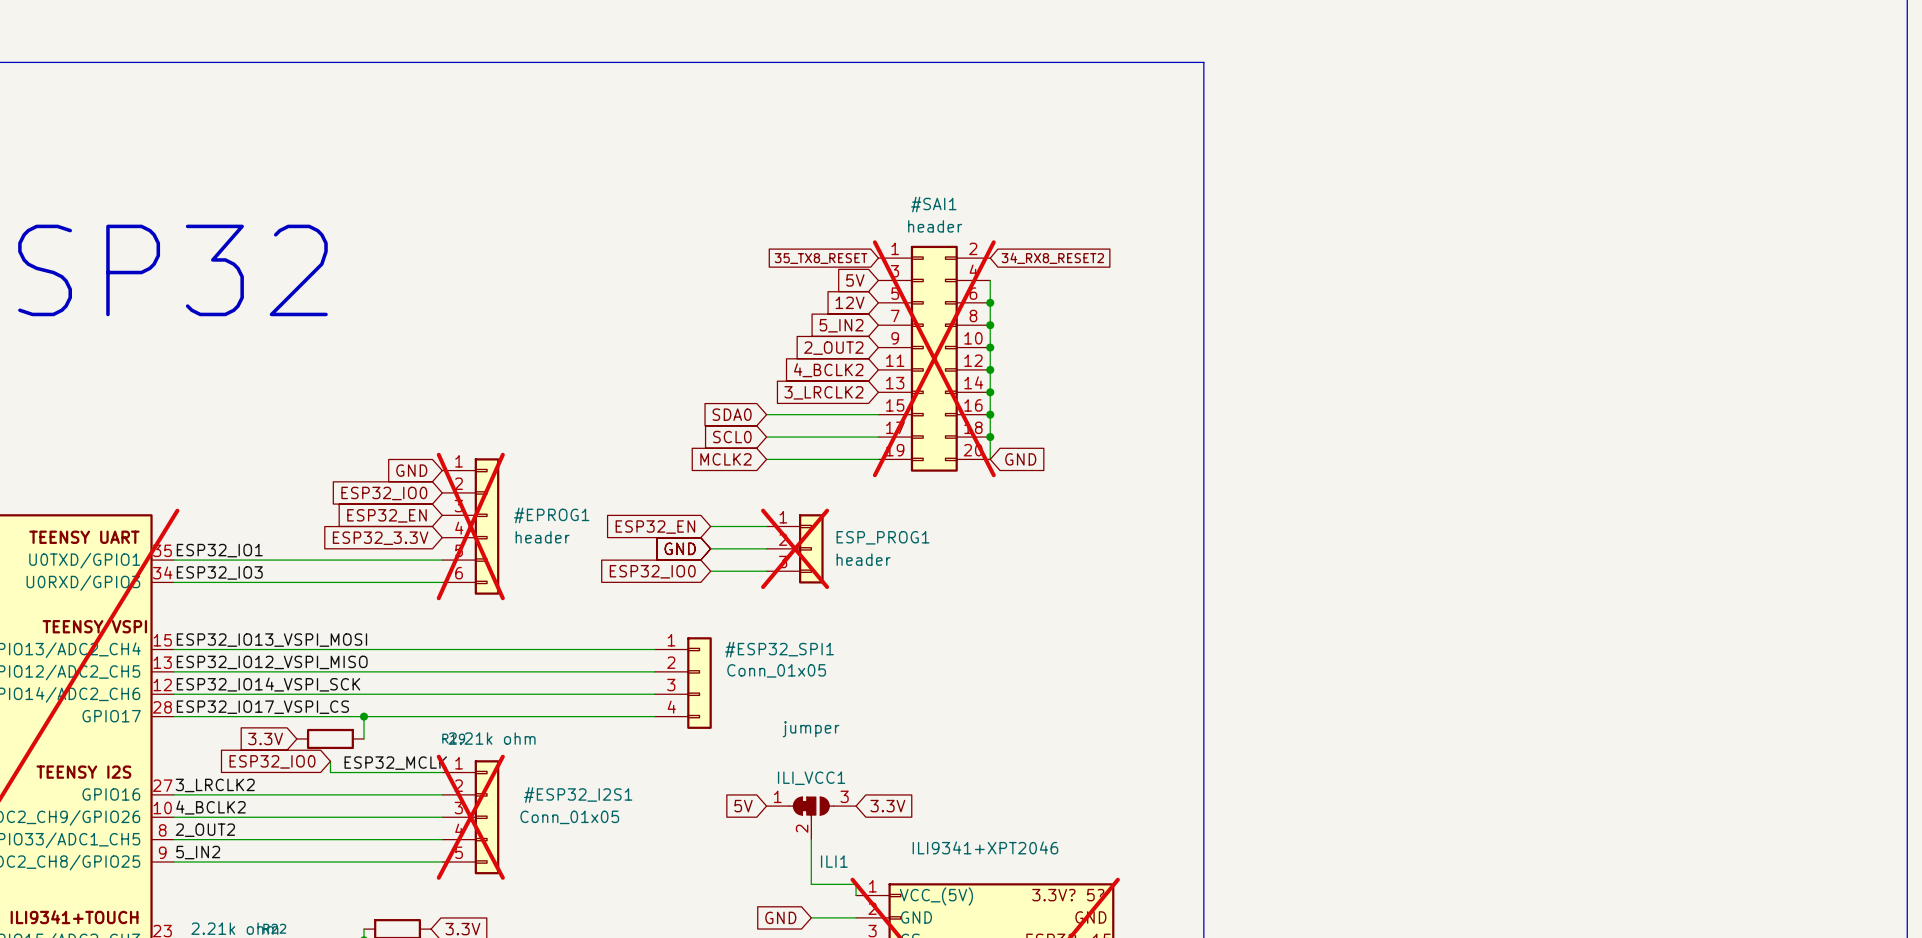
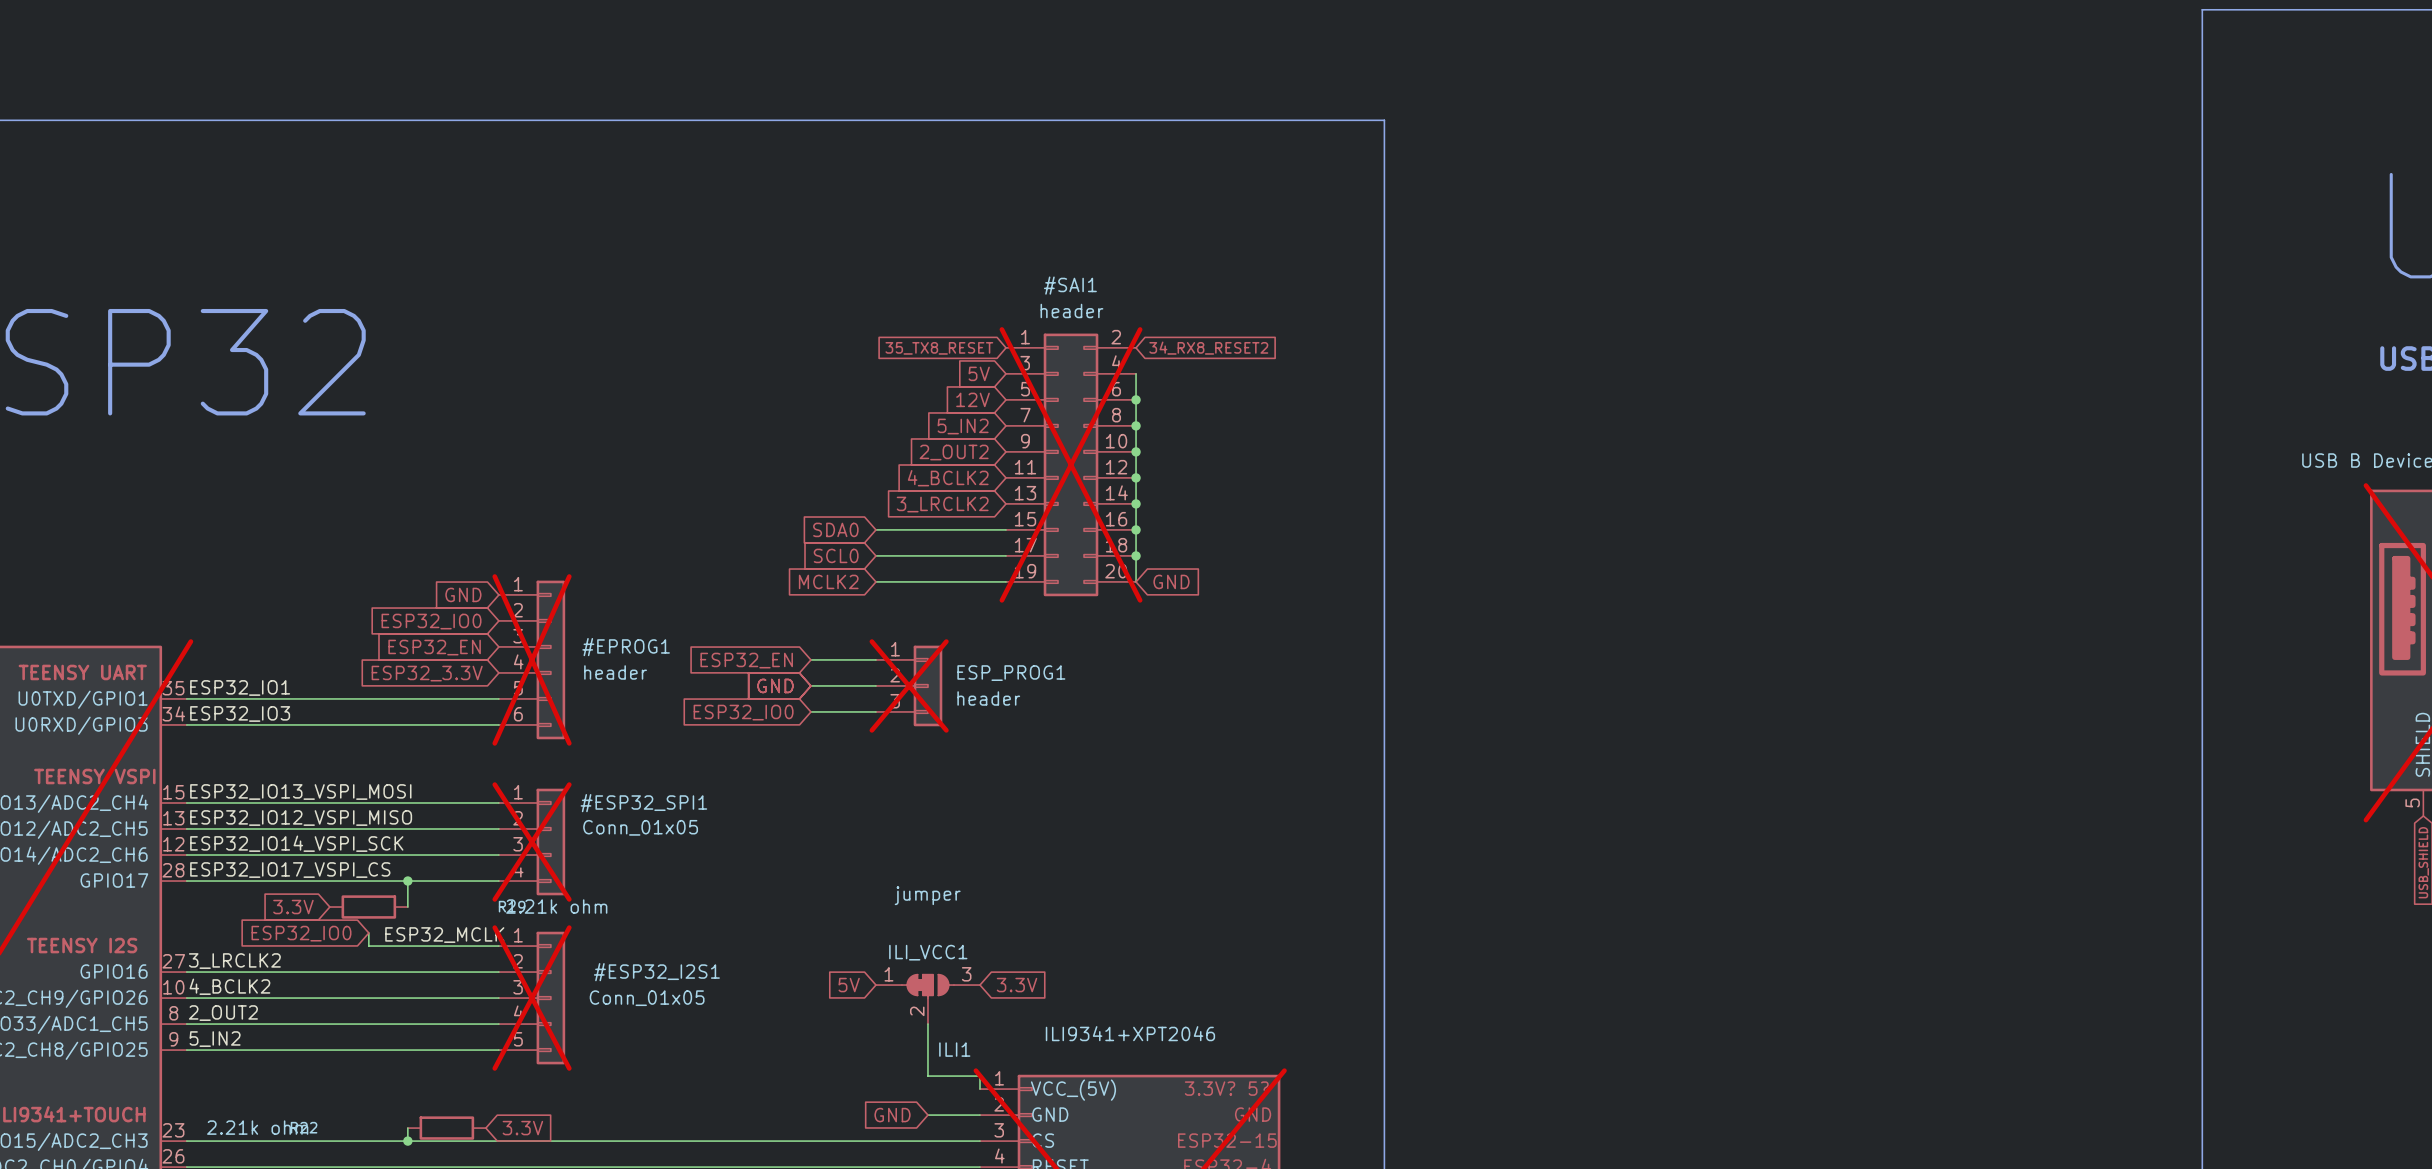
wire: (442, 649) (654, 649) -> none
wire: (442, 671) (654, 671) -> none
#ESP32_SPI1 do-not-place cross: none -> (532, 842)
#ESP32_SPI1 position: Conn_01x05 (683, 683) -> Conn_01x05 (532, 842)
wire: (442, 694) (654, 694) -> none
wire: (442, 716) (654, 716) -> none

